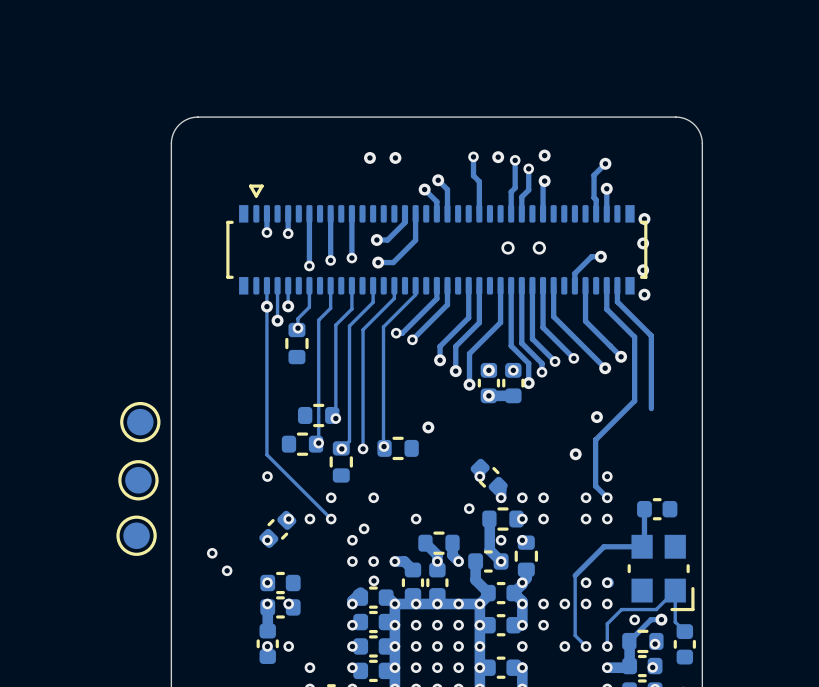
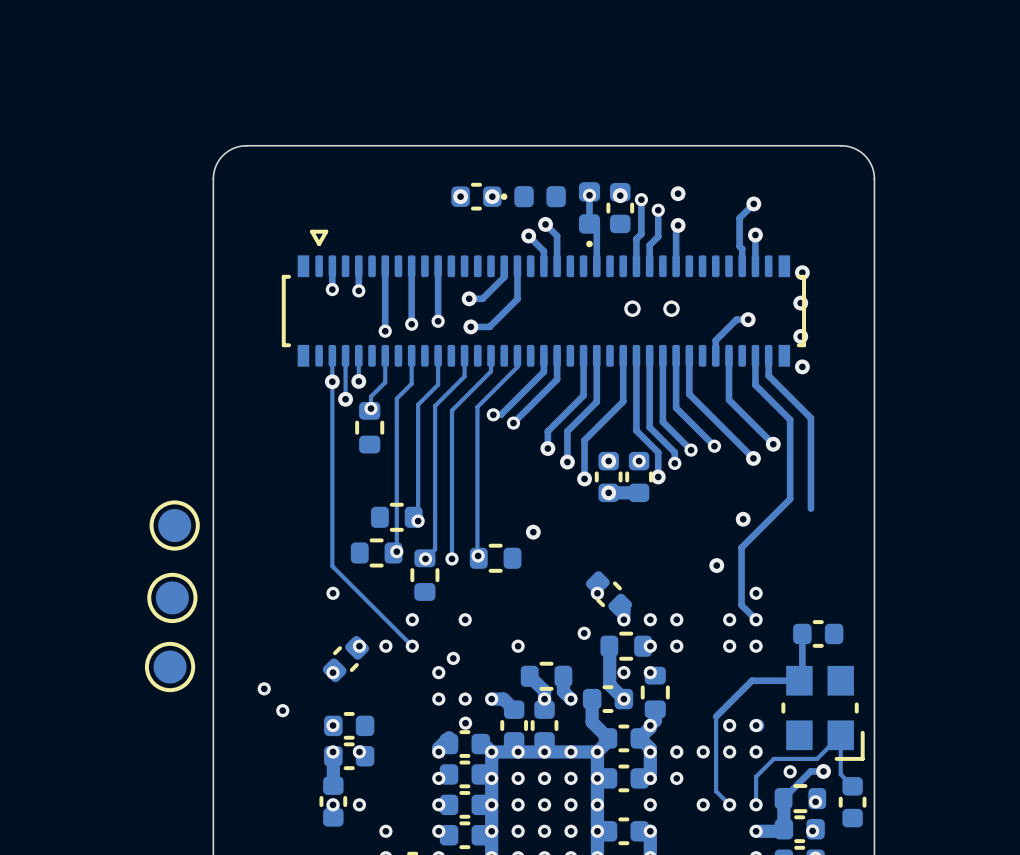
part: none -> (476, 196)
part: none -> (533, 196)
part: none -> (620, 208)
part: none -> (589, 214)

